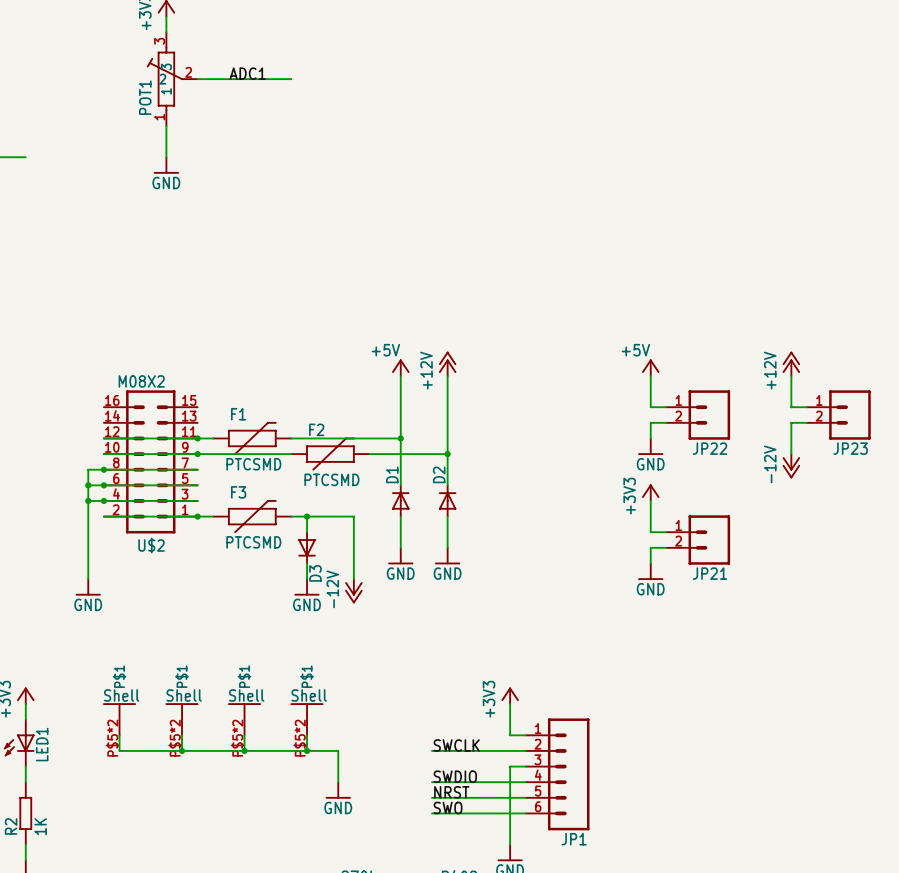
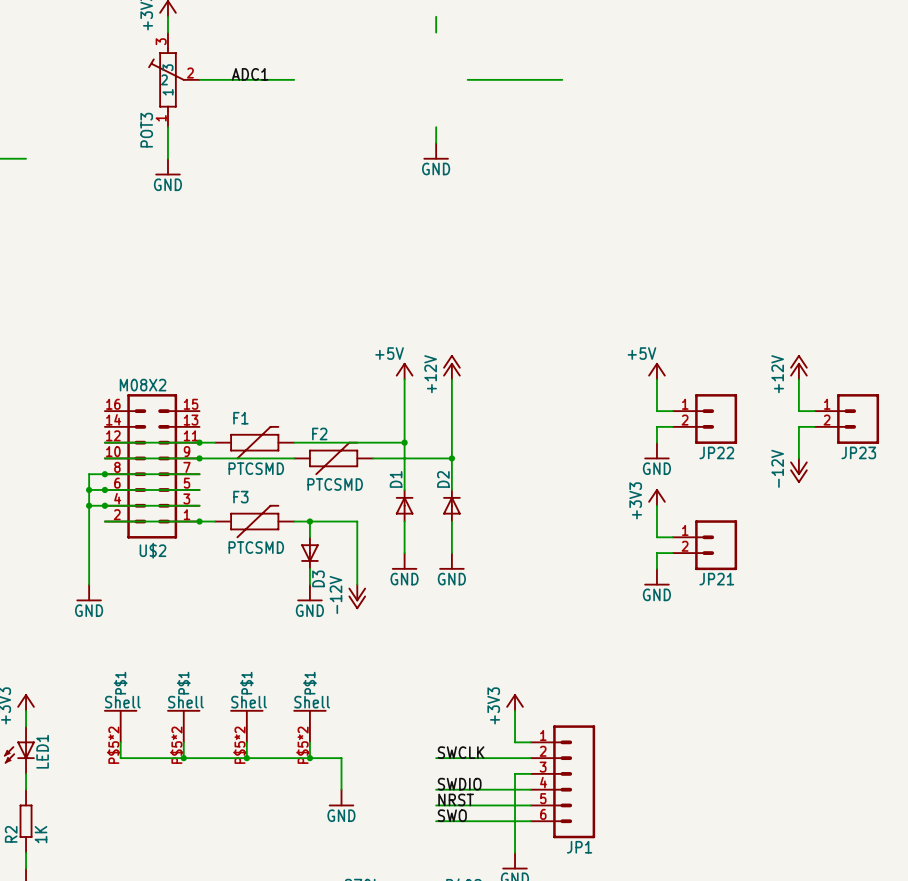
wire: none -> (436, 16) (436, 32)
wire: none -> (467, 79) (562, 79)
POT1 name: POT1 (145, 97) -> POT3 (146, 130)
wire: none -> (436, 127) (436, 142)
power symbol: none -> GND (436, 151)

